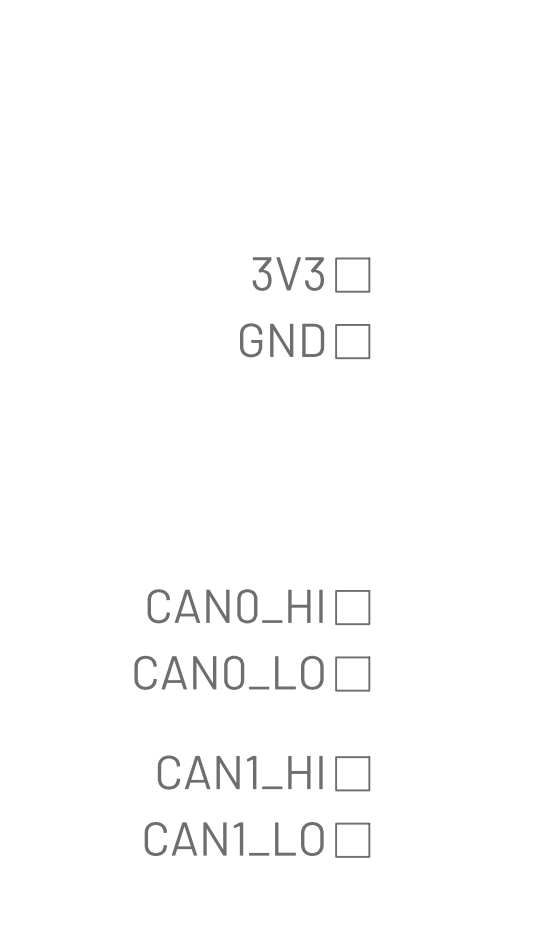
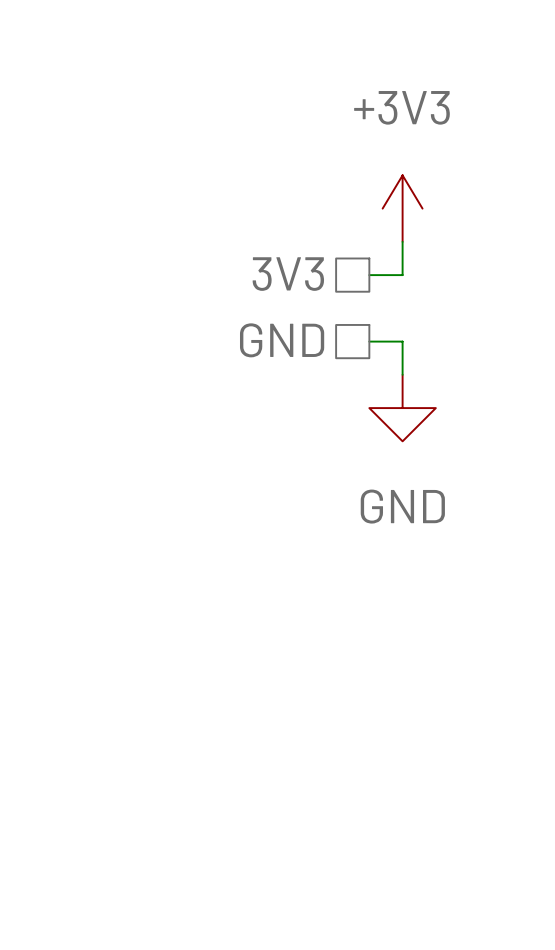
power symbol: none -> +3V3 (402, 208)
wire: none -> (402, 241) (402, 275) (369, 275)
wire: none -> (369, 341) (402, 341) (402, 374)
power symbol: none -> GND (402, 408)
hierarchical label: CAN0_HI (235, 606) -> none
hierarchical label: CAN0_LO (229, 672) -> none
hierarchical label: CAN1_HI (240, 772) -> none
hierarchical label: CAN1_LO (234, 839) -> none

